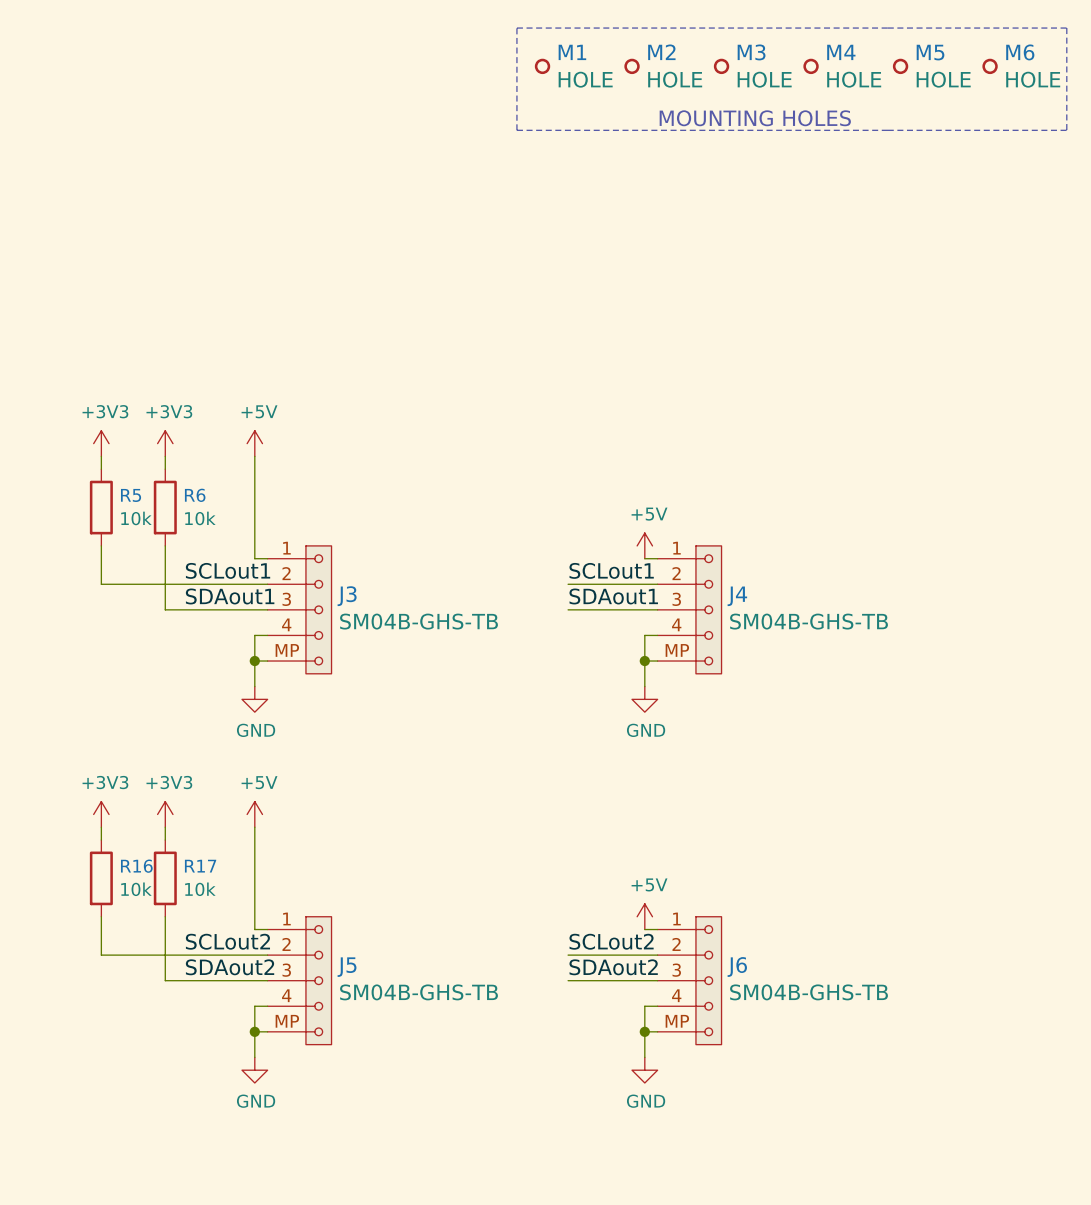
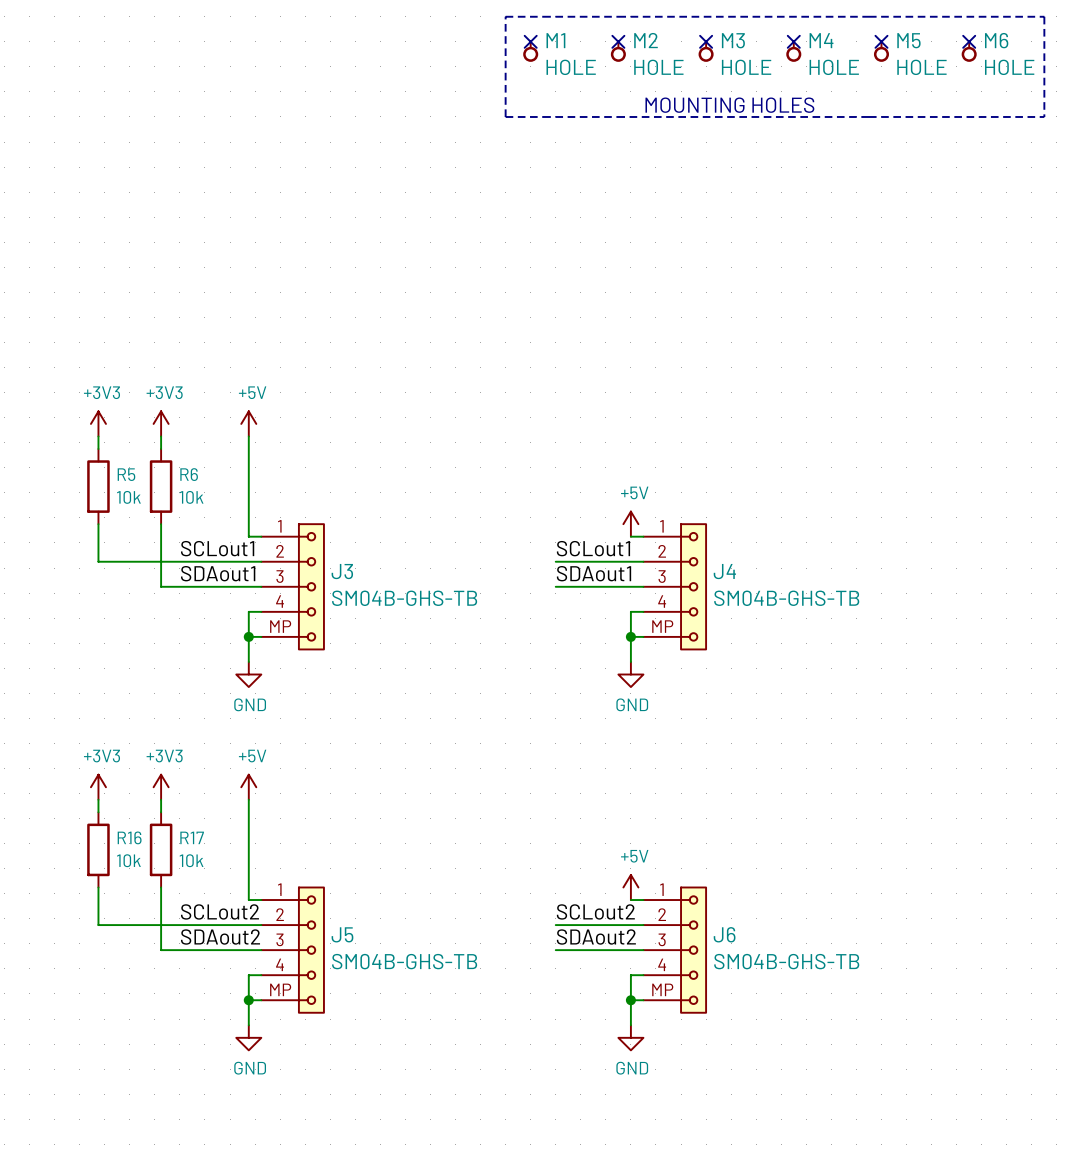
no-connect mark: none -> (530, 41)
no-connect mark: none -> (618, 41)
no-connect mark: none -> (706, 41)
no-connect mark: none -> (793, 41)
no-connect mark: none -> (881, 41)
no-connect mark: none -> (969, 41)
M1 symbol: [534, 58, 551, 75] -> [523, 41, 539, 62]
M2 symbol: [624, 58, 640, 75] -> [610, 41, 626, 62]
M3 symbol: [713, 58, 730, 75] -> [698, 41, 714, 62]
M4 symbol: [803, 58, 819, 75] -> [786, 41, 802, 62]
M5 symbol: [892, 58, 909, 75] -> [873, 41, 890, 62]
M6 symbol: [982, 58, 998, 75] -> [961, 41, 977, 62]

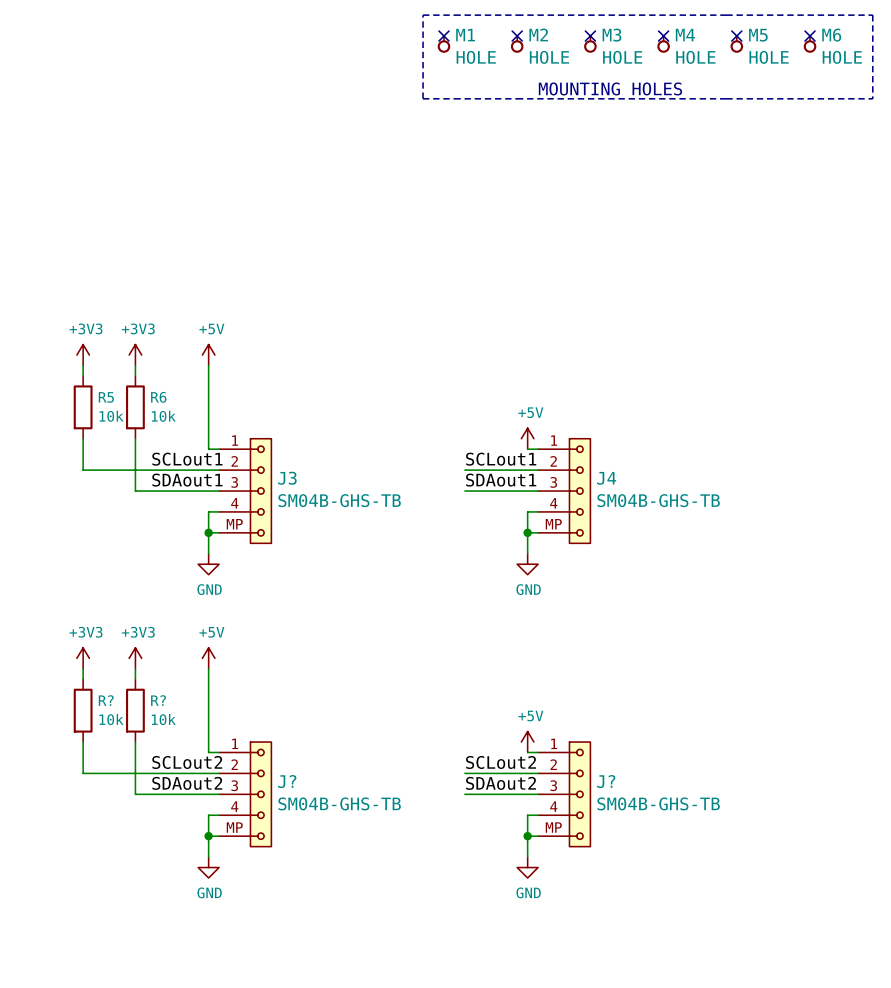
R16 name: R16 (129, 837) -> R? (106, 700)
R17 name: R17 (192, 837) -> R? (158, 700)
J5 name: J5 (342, 934) -> J? (287, 781)
J6 name: J6 (724, 934) -> J? (606, 781)

